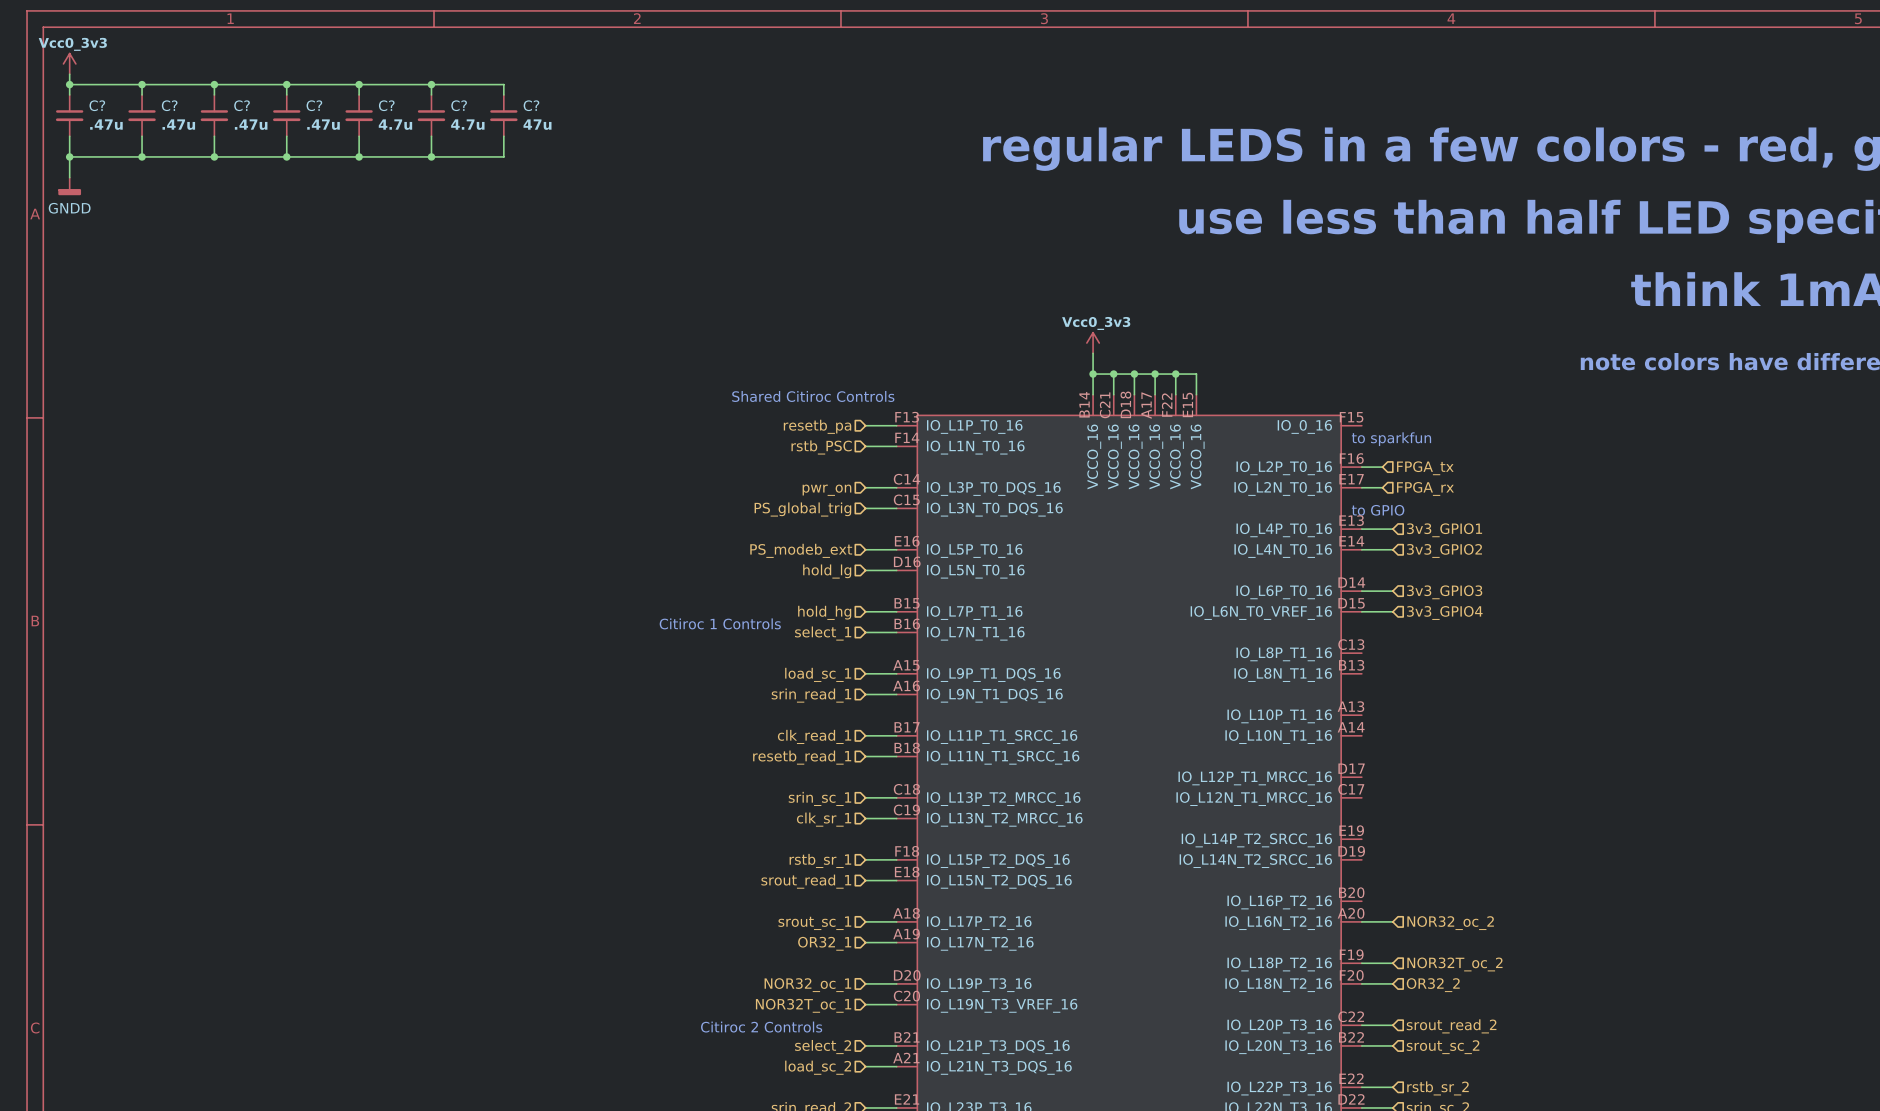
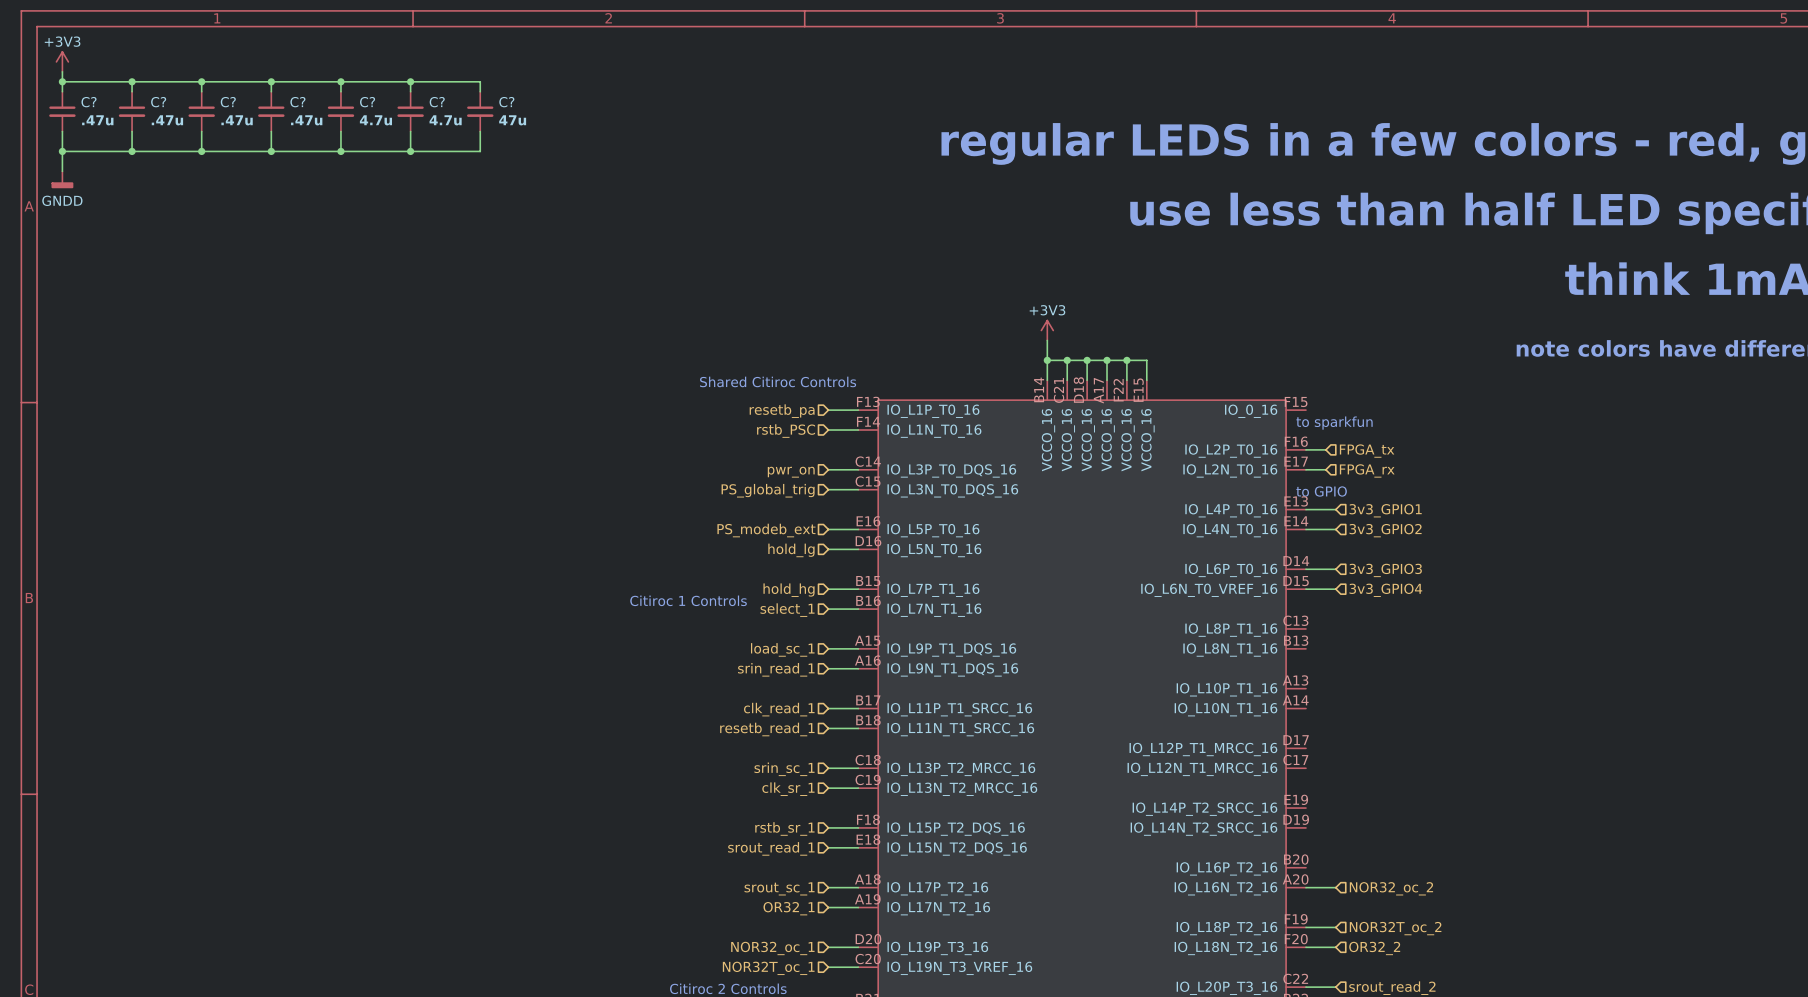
part: Vcc0_3v3 (69, 63) -> none
power symbol: none -> +3V3 (62, 61)
part: Vcc0_3v3 (1093, 343) -> none
power symbol: none -> +3V3 (1047, 330)

